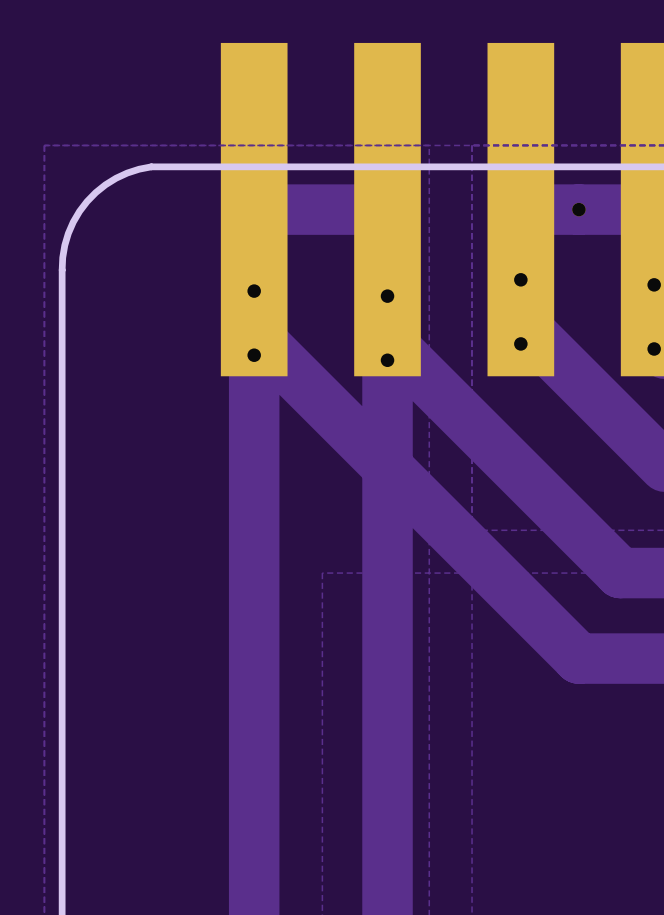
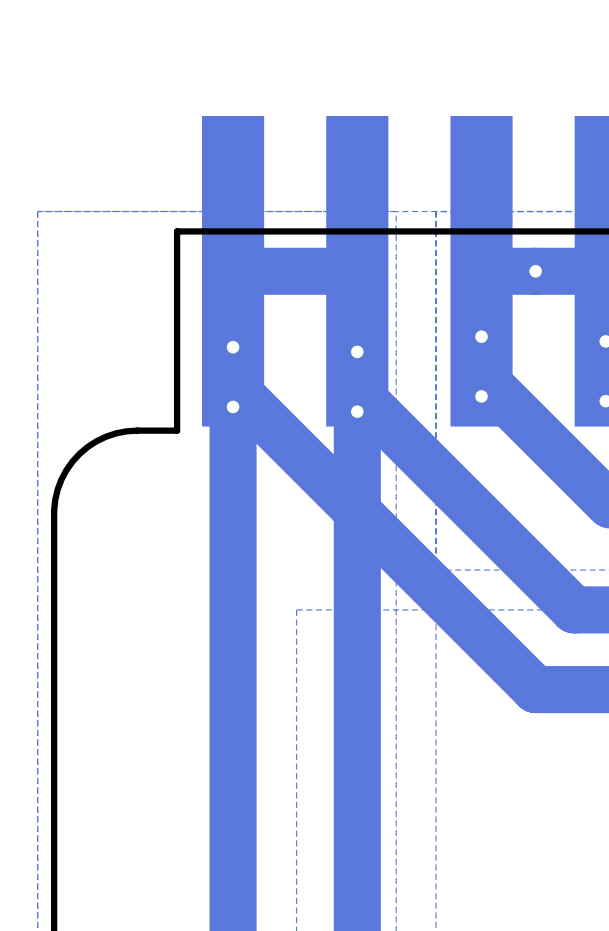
board edge: (194, 166) (151, 166) (127, 173) (116, 178) (95, 192) (79, 211) (73, 222) (64, 245) (62, 270) (62, 466) -> (177, 231) (177, 430) (126, 431) (106, 436) (87, 446) (66, 470) (57, 489) (54, 510)

